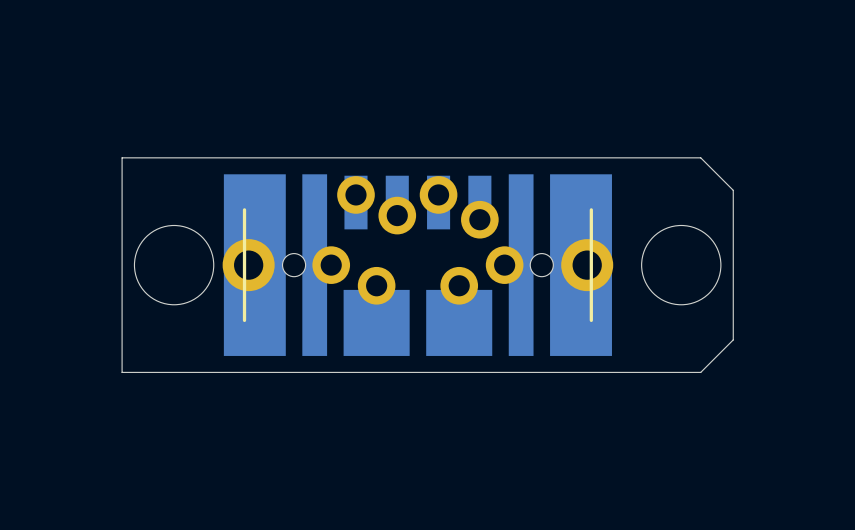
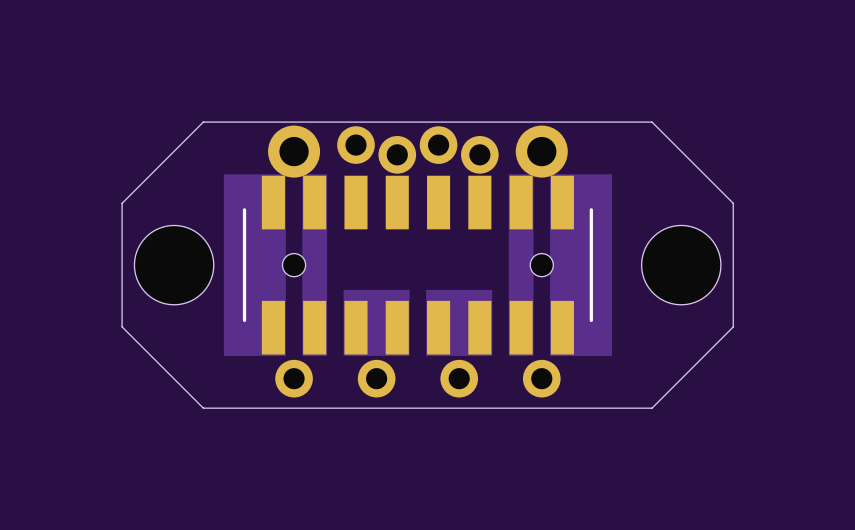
part: none -> (355, 145)
part: none -> (438, 145)
part: none -> (397, 154)
part: none -> (479, 154)
part: (355, 194) -> none
part: (438, 194) -> none
board edge: (733, 203) (733, 190) (700, 157) (122, 157) (122, 203) -> (733, 203) (652, 122) (203, 122) (122, 203)
part: (397, 215) -> none
part: (479, 219) -> none
part position: (248, 265) -> (294, 151)
part: (331, 265) -> none
part: (504, 265) -> none
part position: (587, 265) -> (541, 151)
part: (376, 285) -> none
part: (459, 285) -> none
board edge: (733, 326) (733, 339) (700, 372) (122, 372) (122, 326) -> (733, 326) (652, 408) (203, 408) (122, 326)
part: none -> (294, 378)
part: none -> (376, 378)
part: none -> (459, 378)
part: none -> (541, 378)

